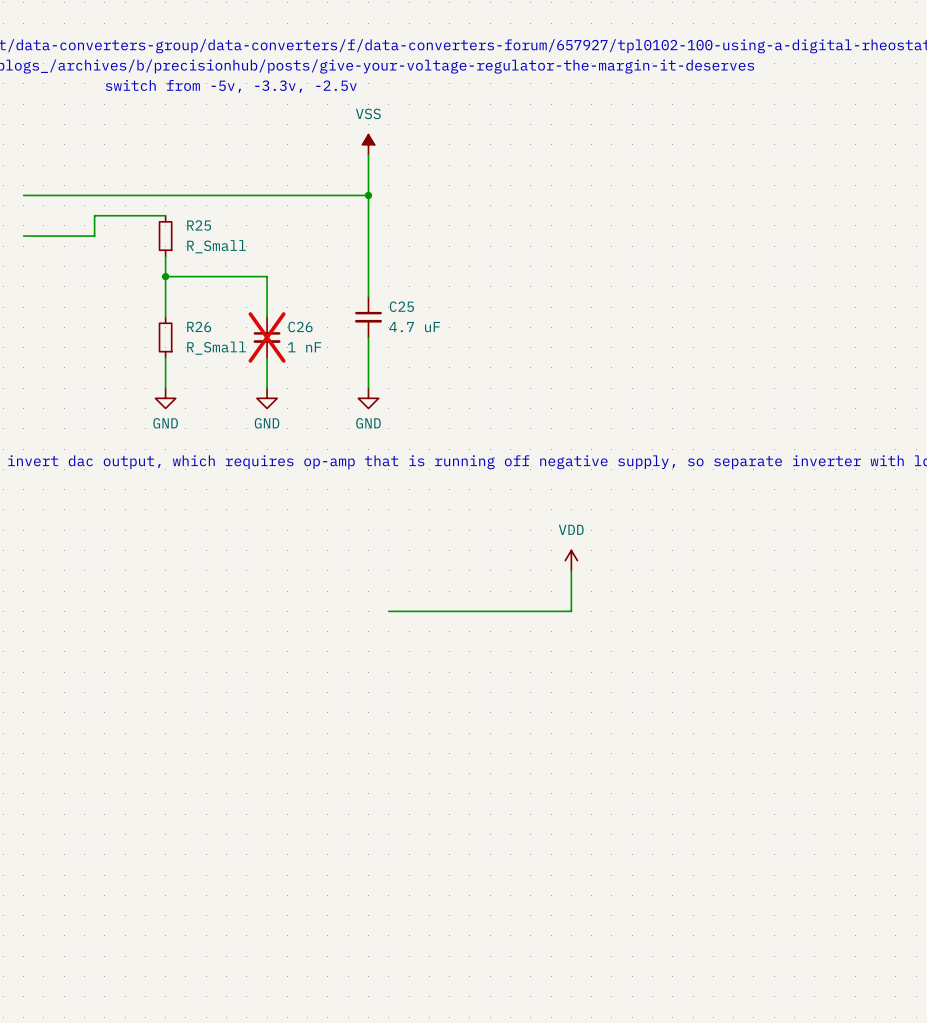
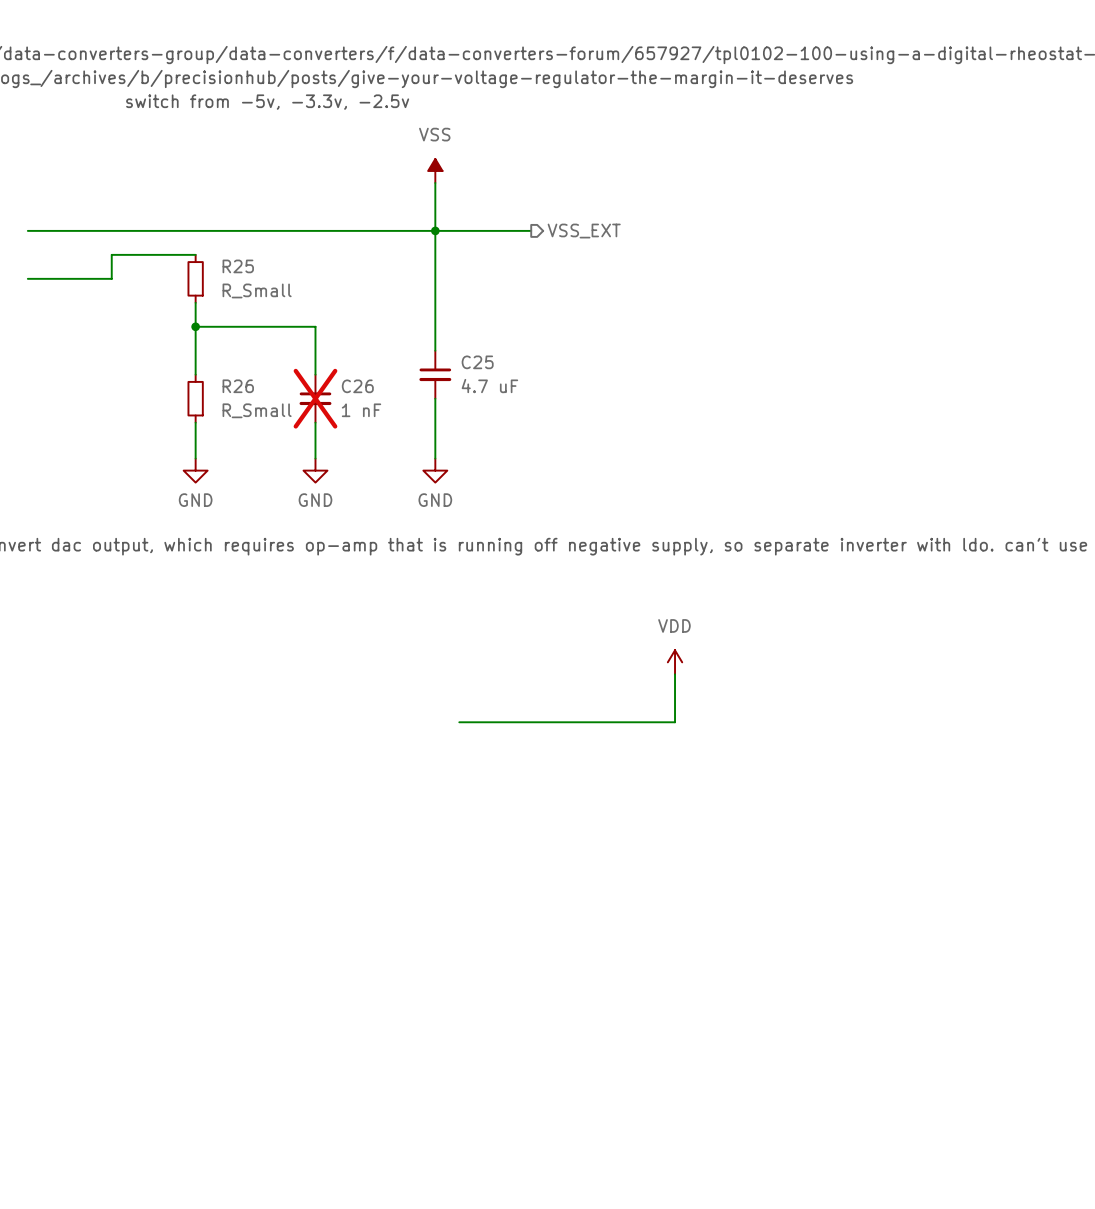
wire: none -> (435, 230) (531, 230)
hierarchical label: none -> VSS_EXT (584, 231)

